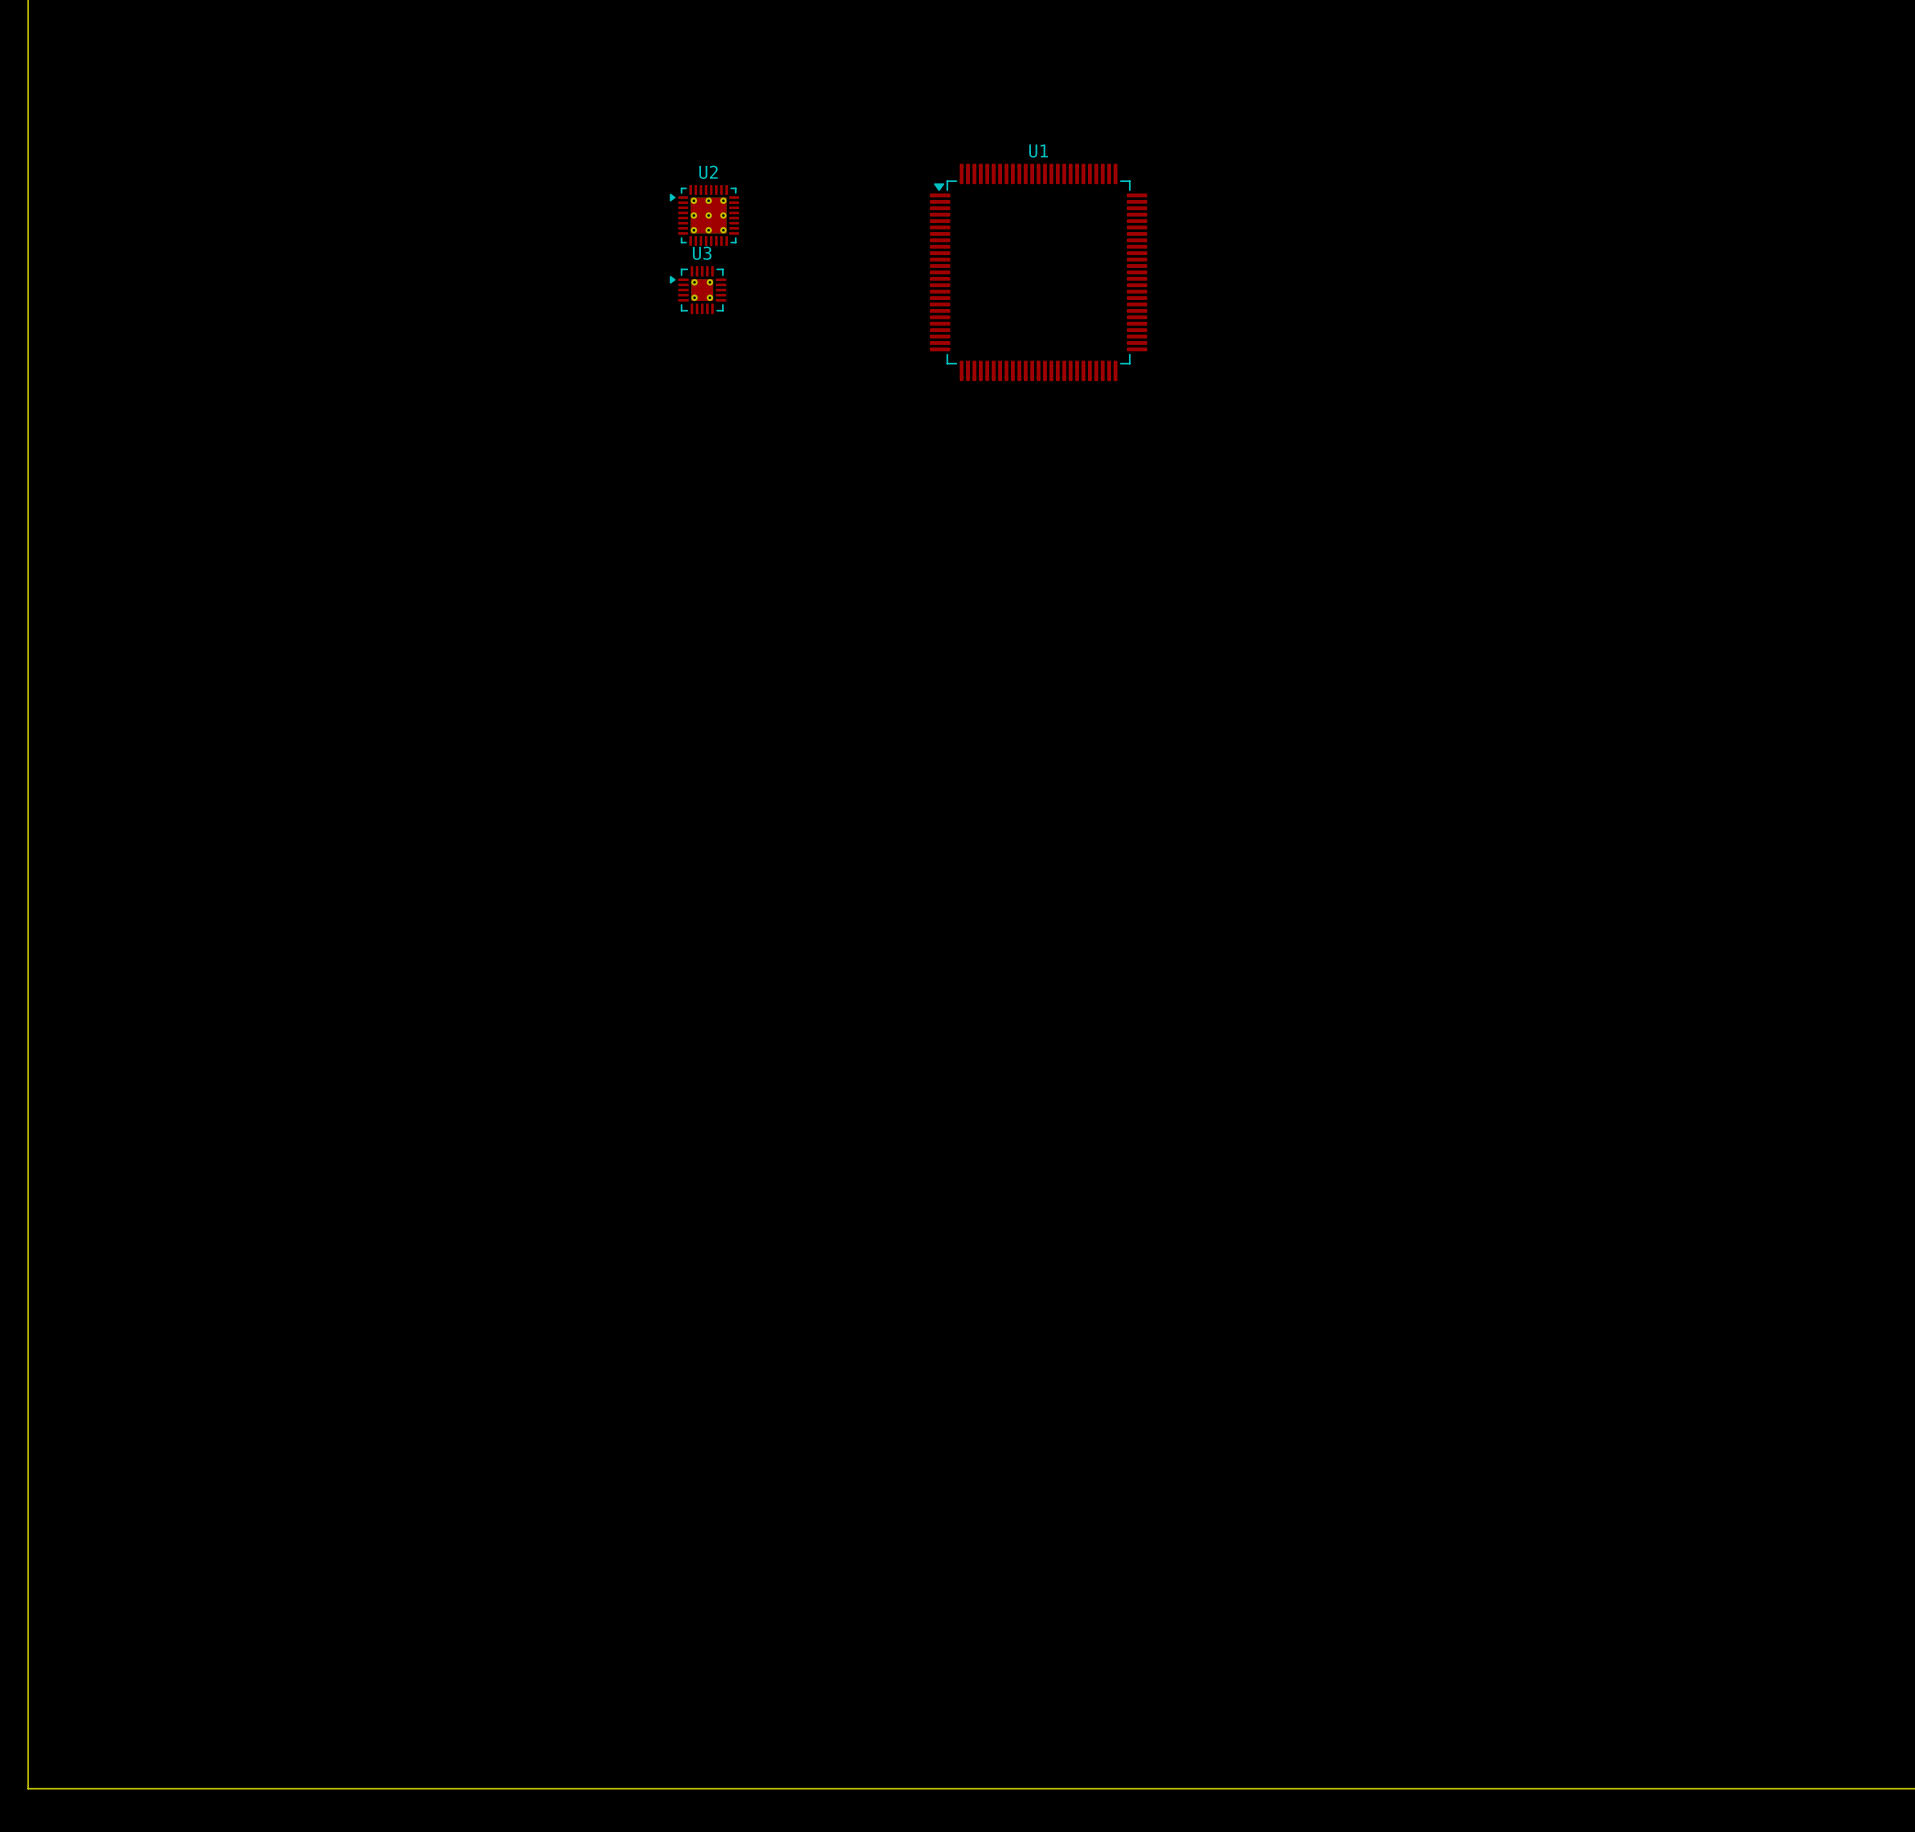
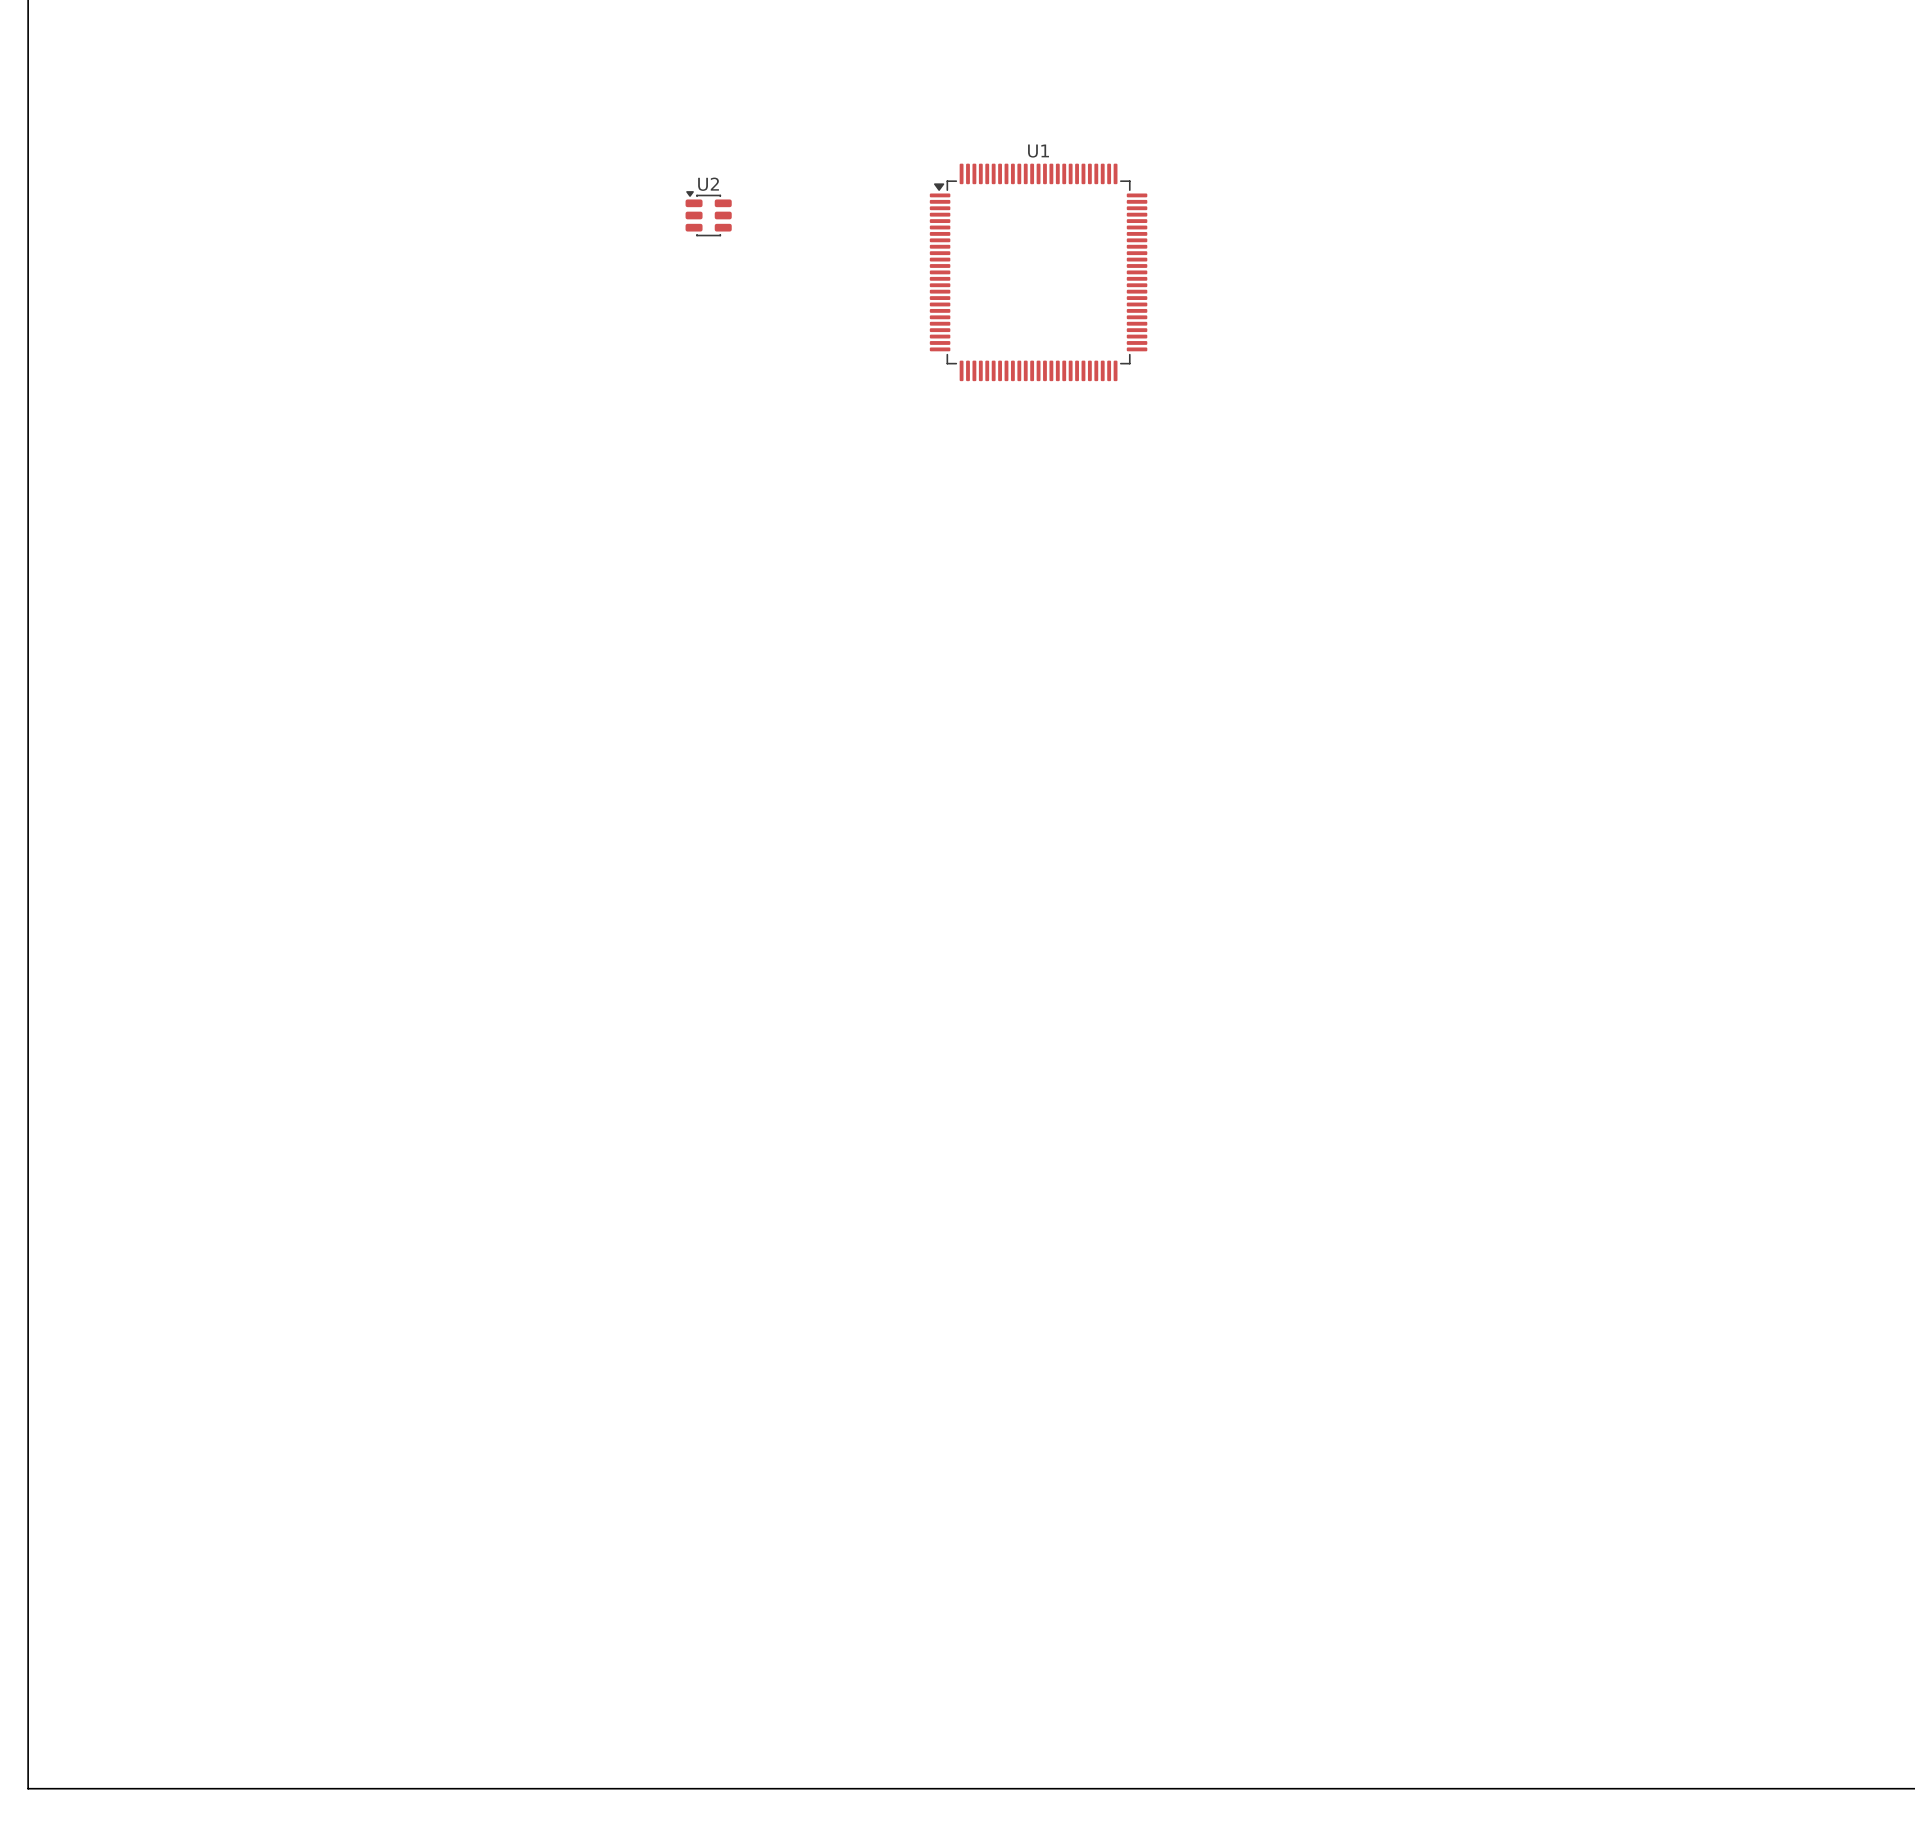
U2 footprint: [669, 185, 740, 246] -> [685, 191, 732, 237]
U3: (698, 290) -> none

